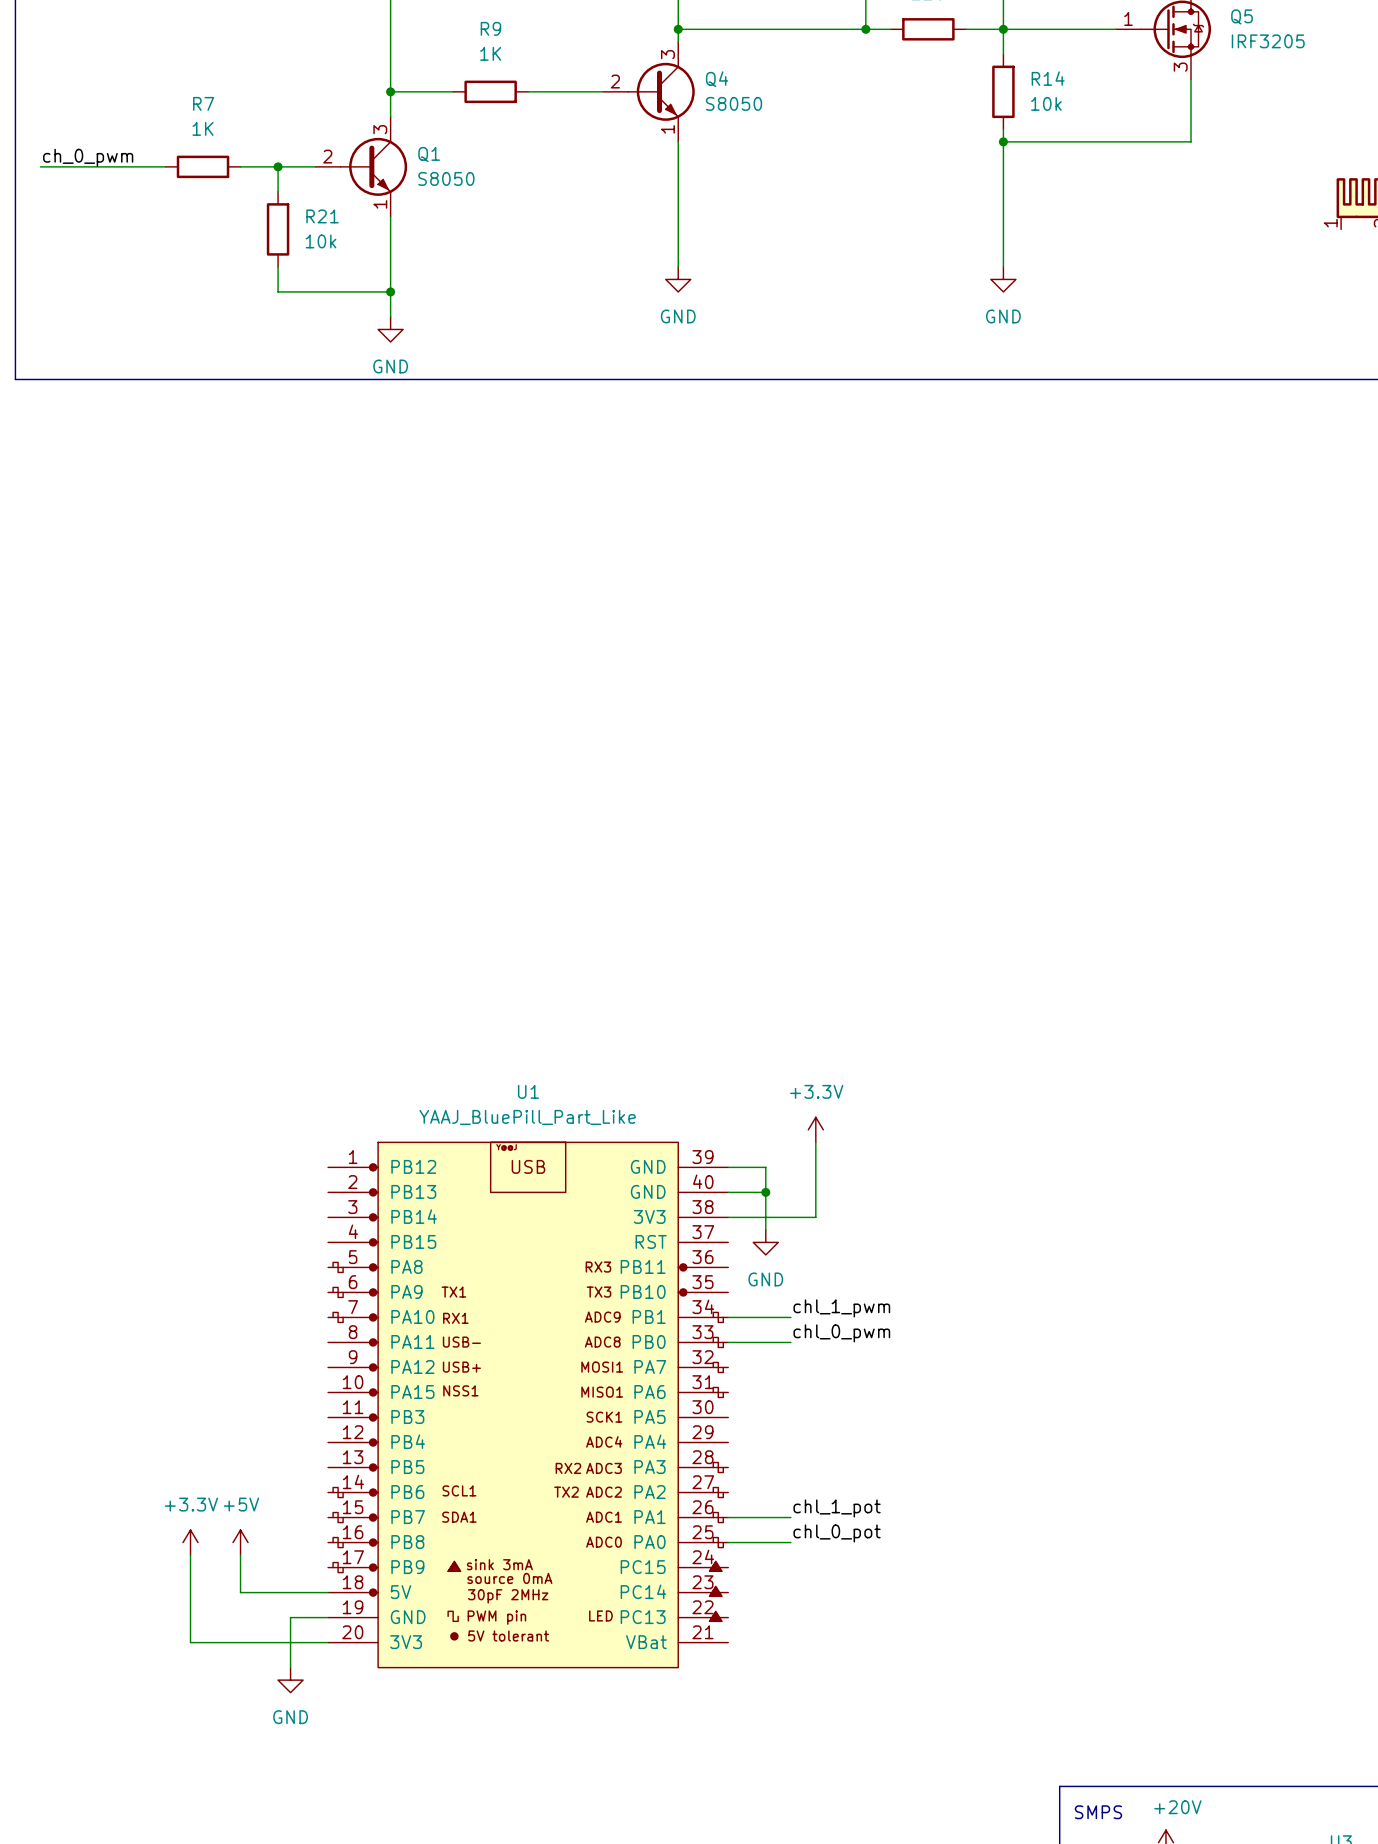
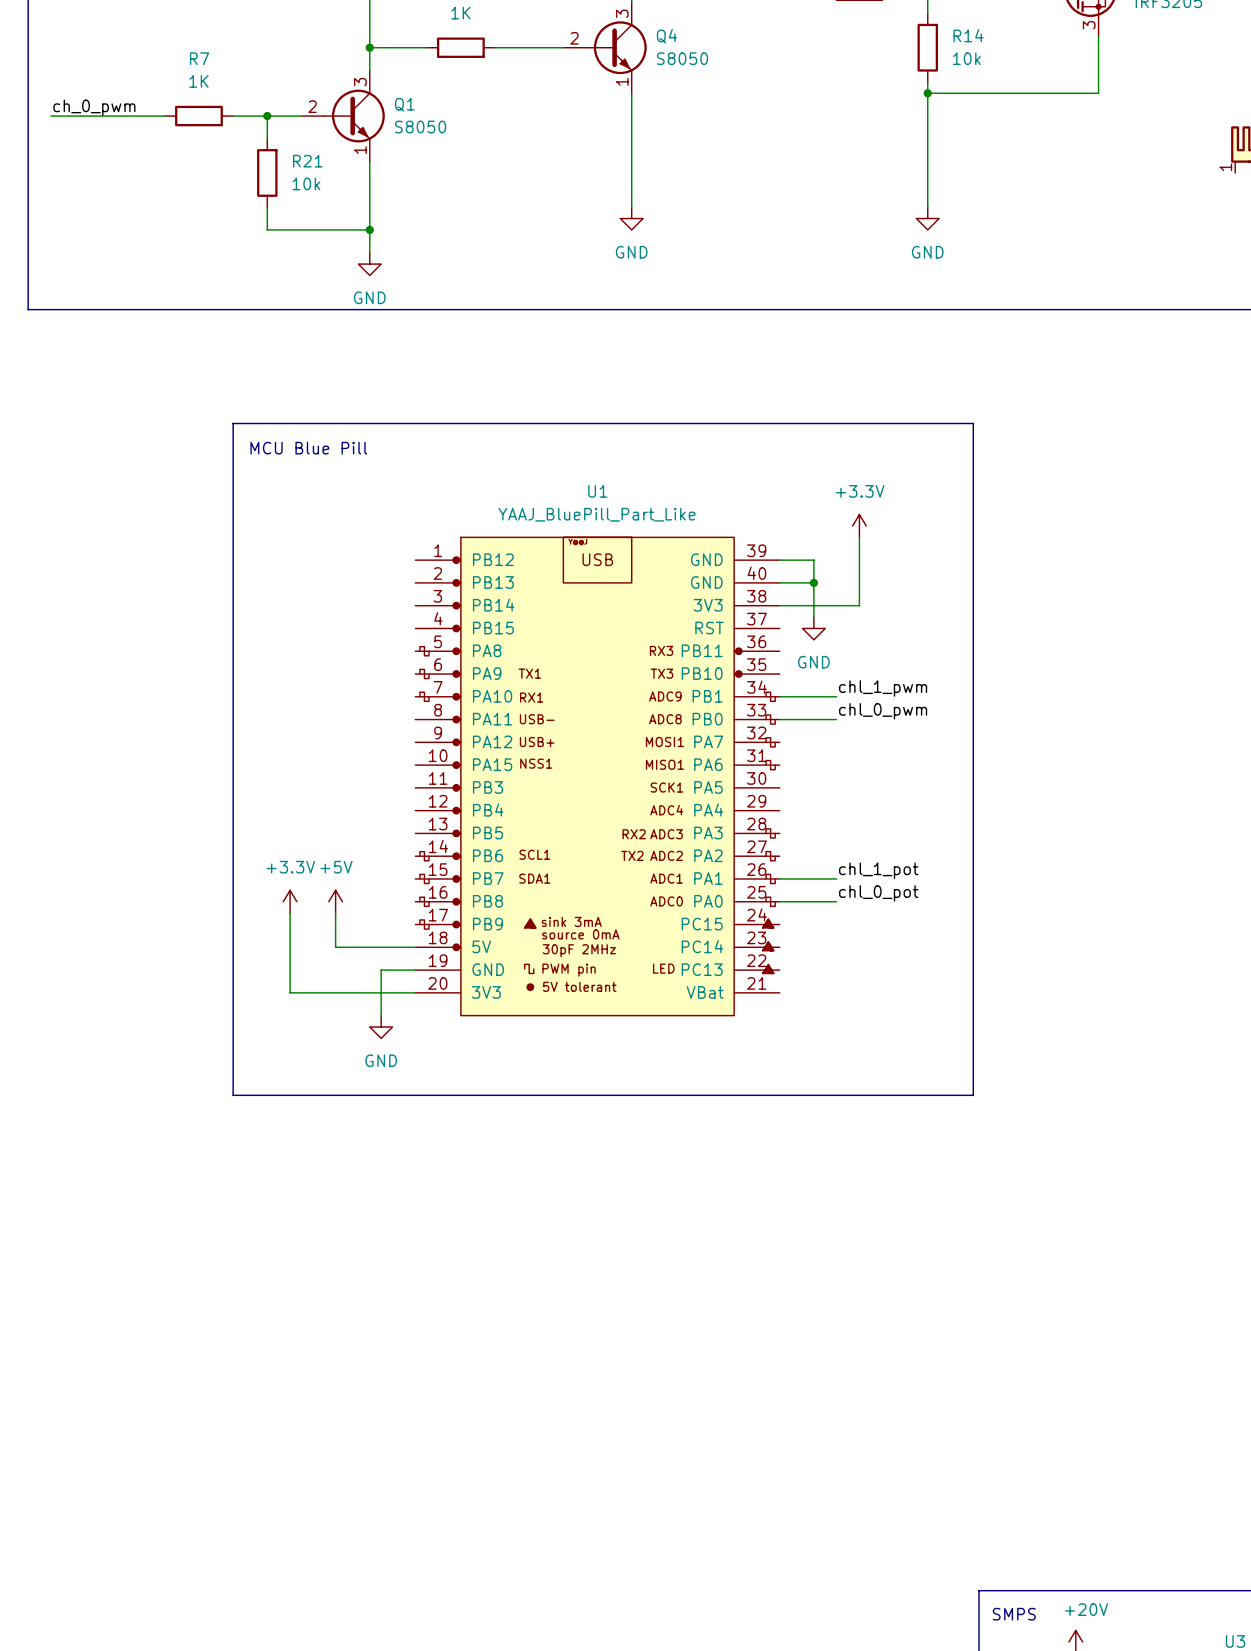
line: none -> (233, 423) (973, 423) (973, 1095) (233, 1095) (233, 423)
text: none -> MCU Blue Pill (308, 448)
power symbol: none -> +3.3V (859, 525)
wire: none -> (859, 537) (859, 605) (779, 605)
wire: none -> (779, 560) (813, 560) (813, 617)
wire: none -> (779, 582) (813, 582)
junction: none -> (813, 582)
power symbol: none -> GND (813, 628)
label: none -> chl_1_pwm (883, 688)
wire: none -> (779, 696) (836, 696)
label: none -> chl_0_pwm (883, 711)
wire: none -> (779, 719) (836, 719)
label: none -> chl_1_pot (878, 870)
wire: none -> (779, 878) (836, 878)
label: none -> chl_0_pot (878, 893)
power symbol: none -> +3.3V (290, 901)
power symbol: none -> +5V (335, 901)
wire: none -> (779, 901) (836, 901)
wire: none -> (290, 913) (290, 992) (415, 992)
wire: none -> (335, 913) (335, 947) (415, 947)
wire: none -> (415, 970) (381, 970) (381, 1015)
power symbol: +3.3V (815, 1129) -> none
U1 symbol: [328, 1142, 729, 1668] -> [415, 537, 780, 1016]
wire: (815, 1142) (815, 1217) (728, 1217) -> none
power symbol: none -> GND (381, 1027)
wire: (728, 1167) (765, 1167) (765, 1229) -> none
wire: (728, 1192) (765, 1192) -> none
junction: (765, 1192) -> none
power symbol: GND (765, 1242) -> none
label: chl_1_pwm (841, 1308) -> none
wire: (728, 1317) (790, 1317) -> none
label: chl_0_pwm (841, 1333) -> none
wire: (728, 1342) (790, 1342) -> none
label: chl_1_pot (837, 1508) -> none
wire: (728, 1517) (790, 1517) -> none
label: chl_0_pot (837, 1533) -> none
power symbol: +3.3V (190, 1542) -> none
power symbol: +5V (240, 1542) -> none
wire: (728, 1542) (790, 1542) -> none
wire: (190, 1555) (190, 1642) (328, 1642) -> none
wire: (240, 1555) (240, 1592) (328, 1592) -> none
wire: (328, 1617) (290, 1617) (290, 1667) -> none
power symbol: GND (290, 1680) -> none

